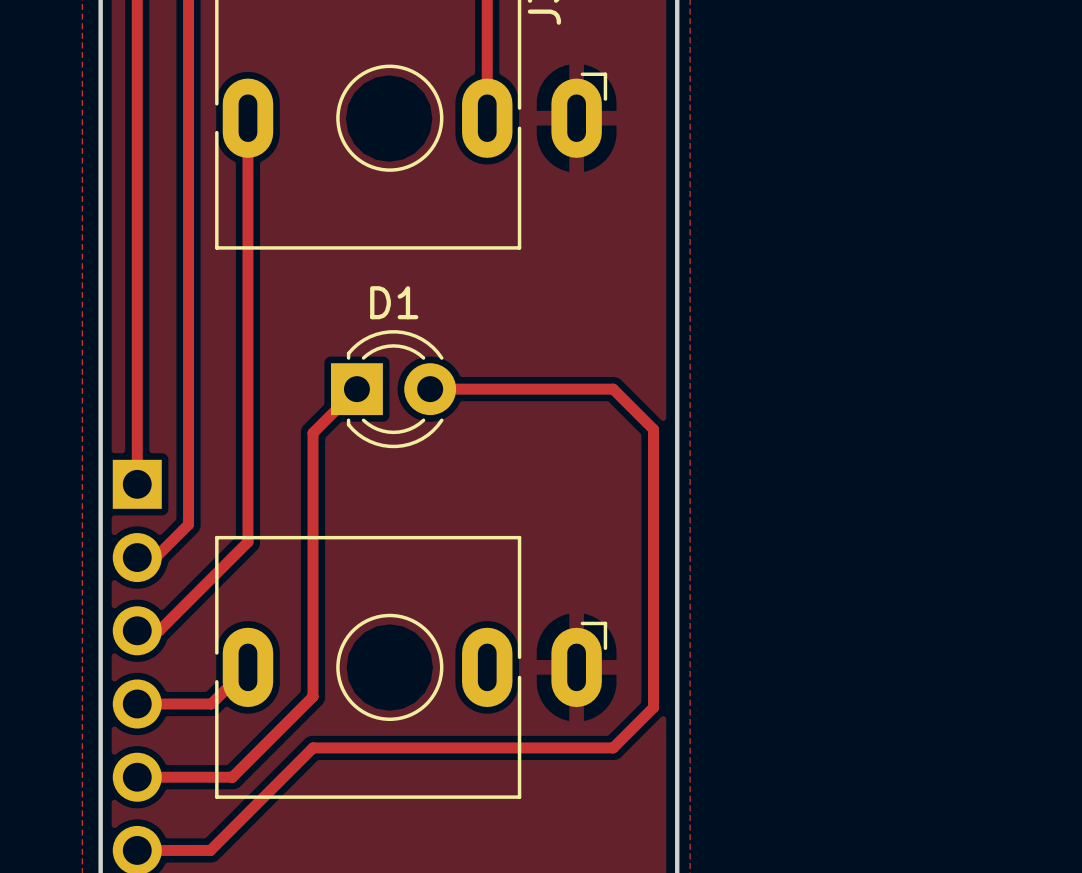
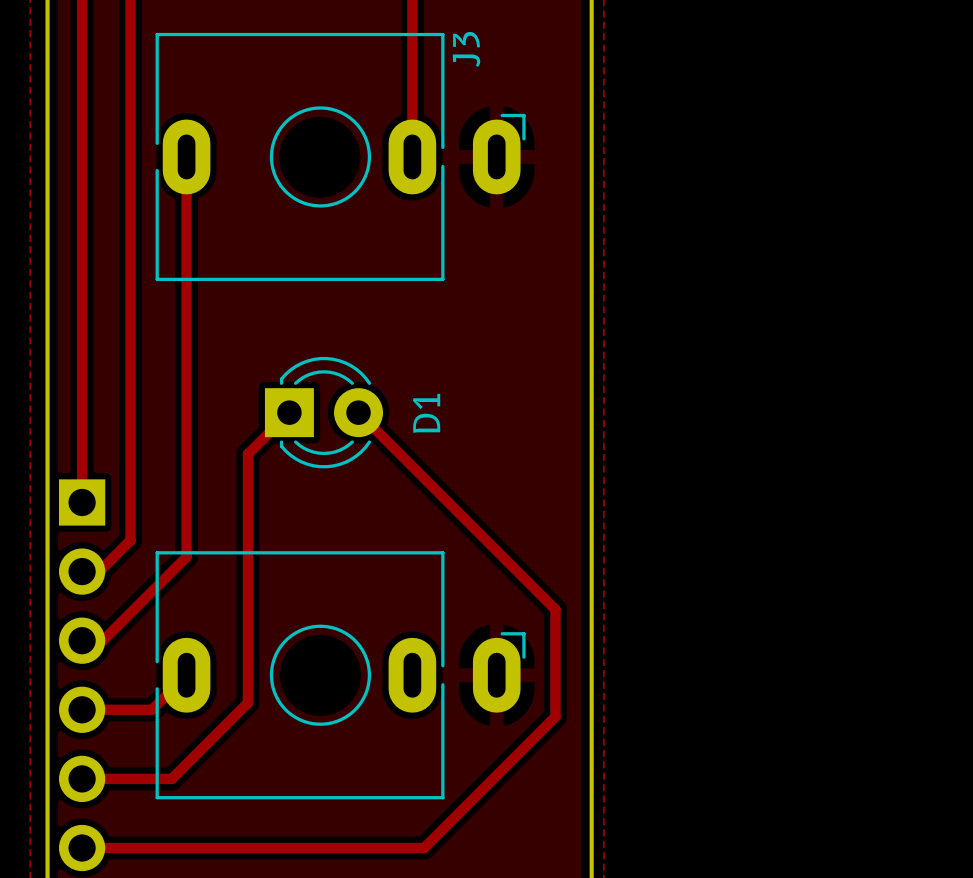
D1 name rotation: 0° (394, 302) -> 90° counterclockwise (426, 413)
D1 name position: D1 (394, 302) -> D1 (426, 413)
track: (430, 389) (613, 389) (653, 429) (653, 707) (613, 747) (313, 747) (210, 850) -> (358, 412) (555, 609) (555, 716) (424, 848) (151, 848)

